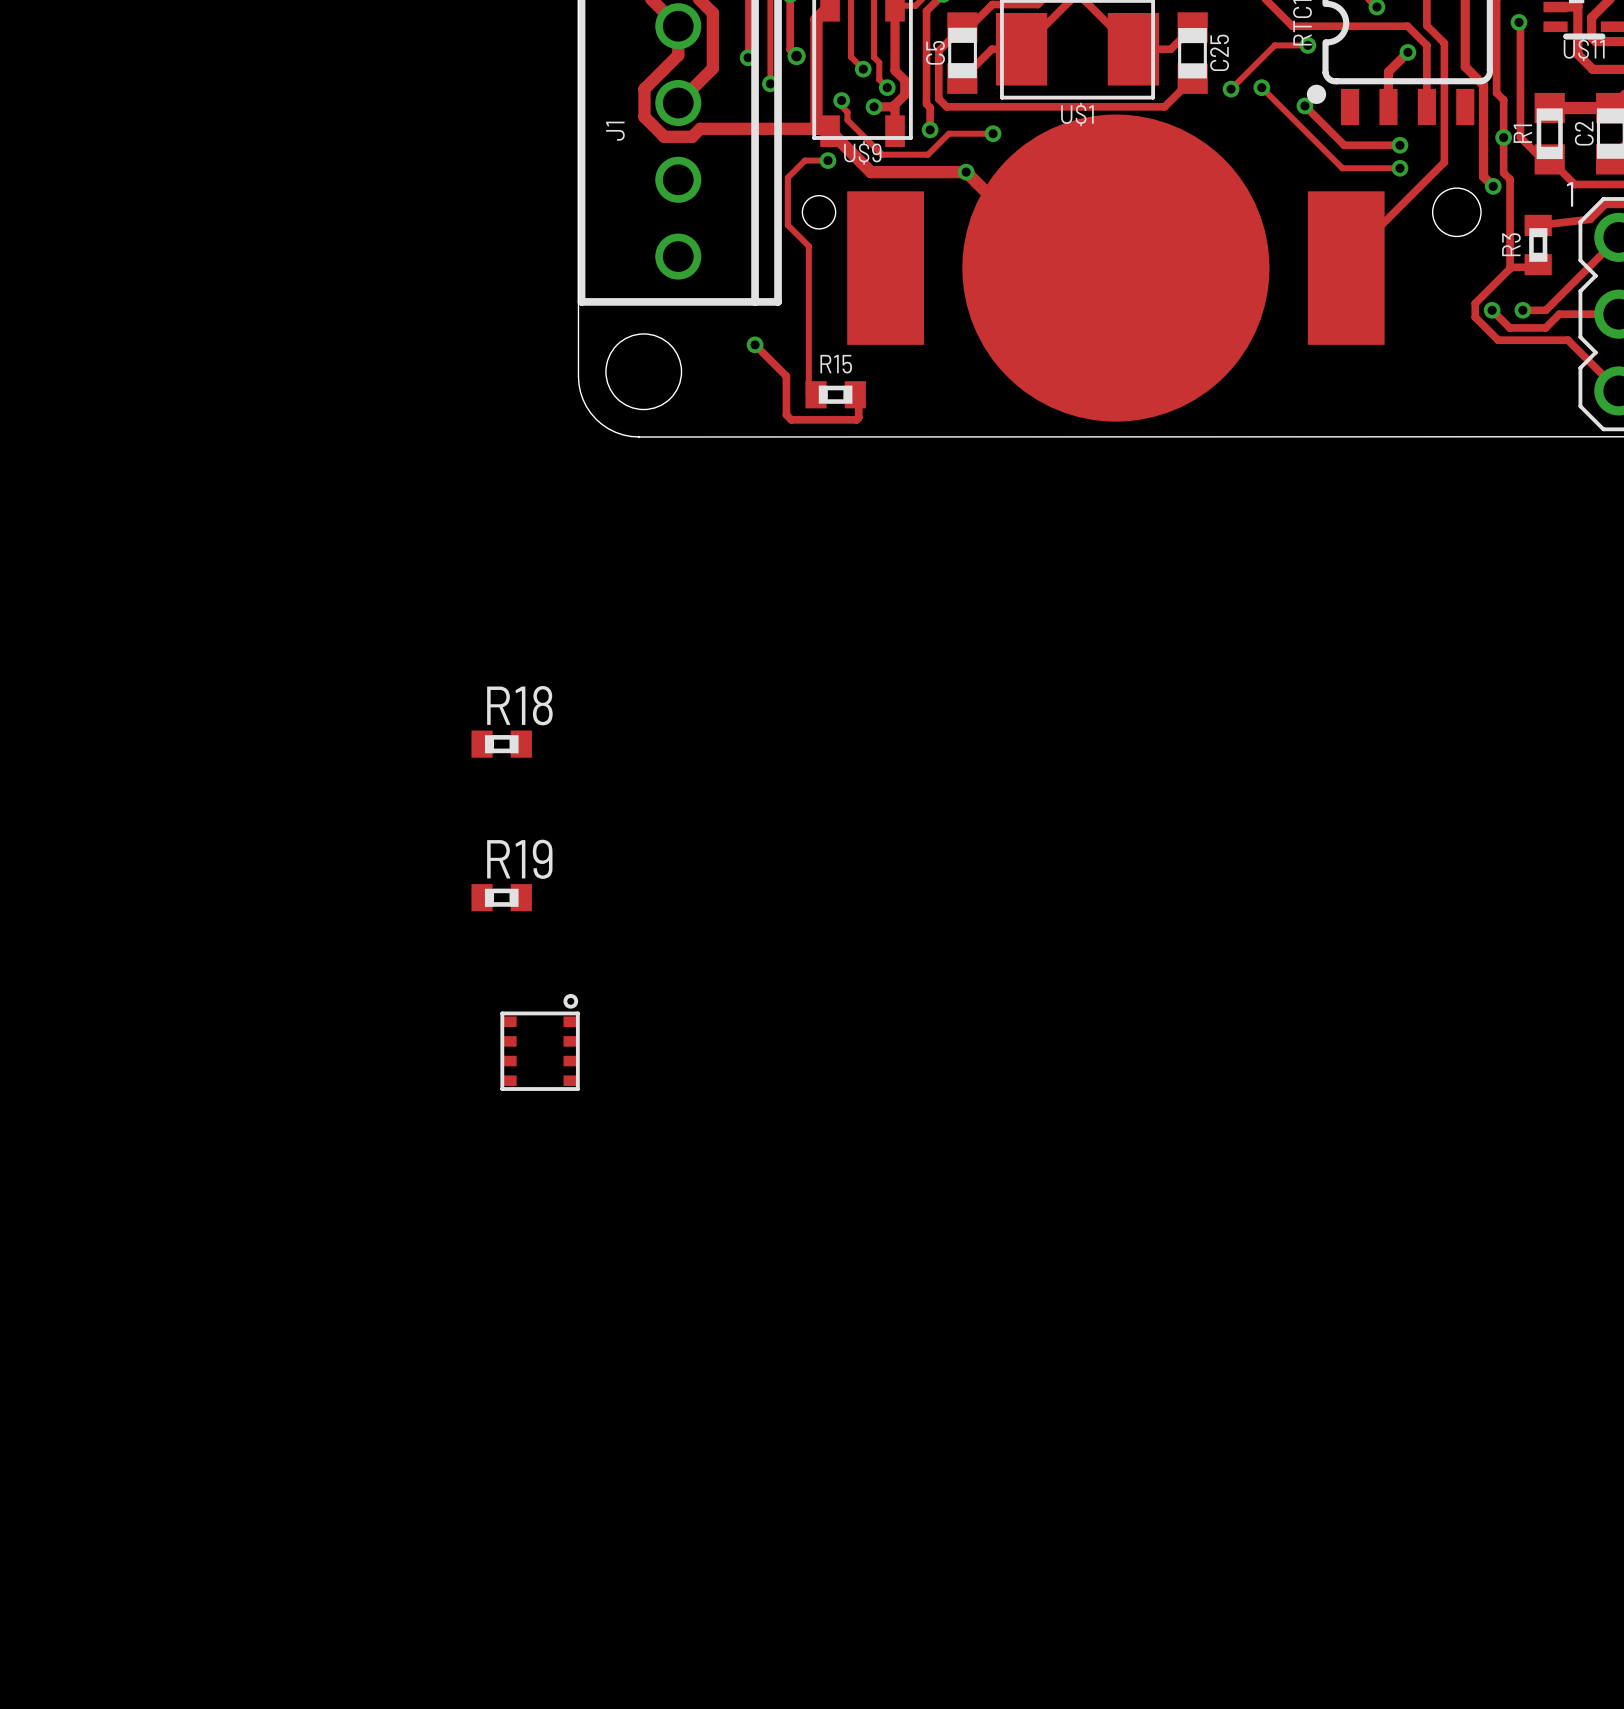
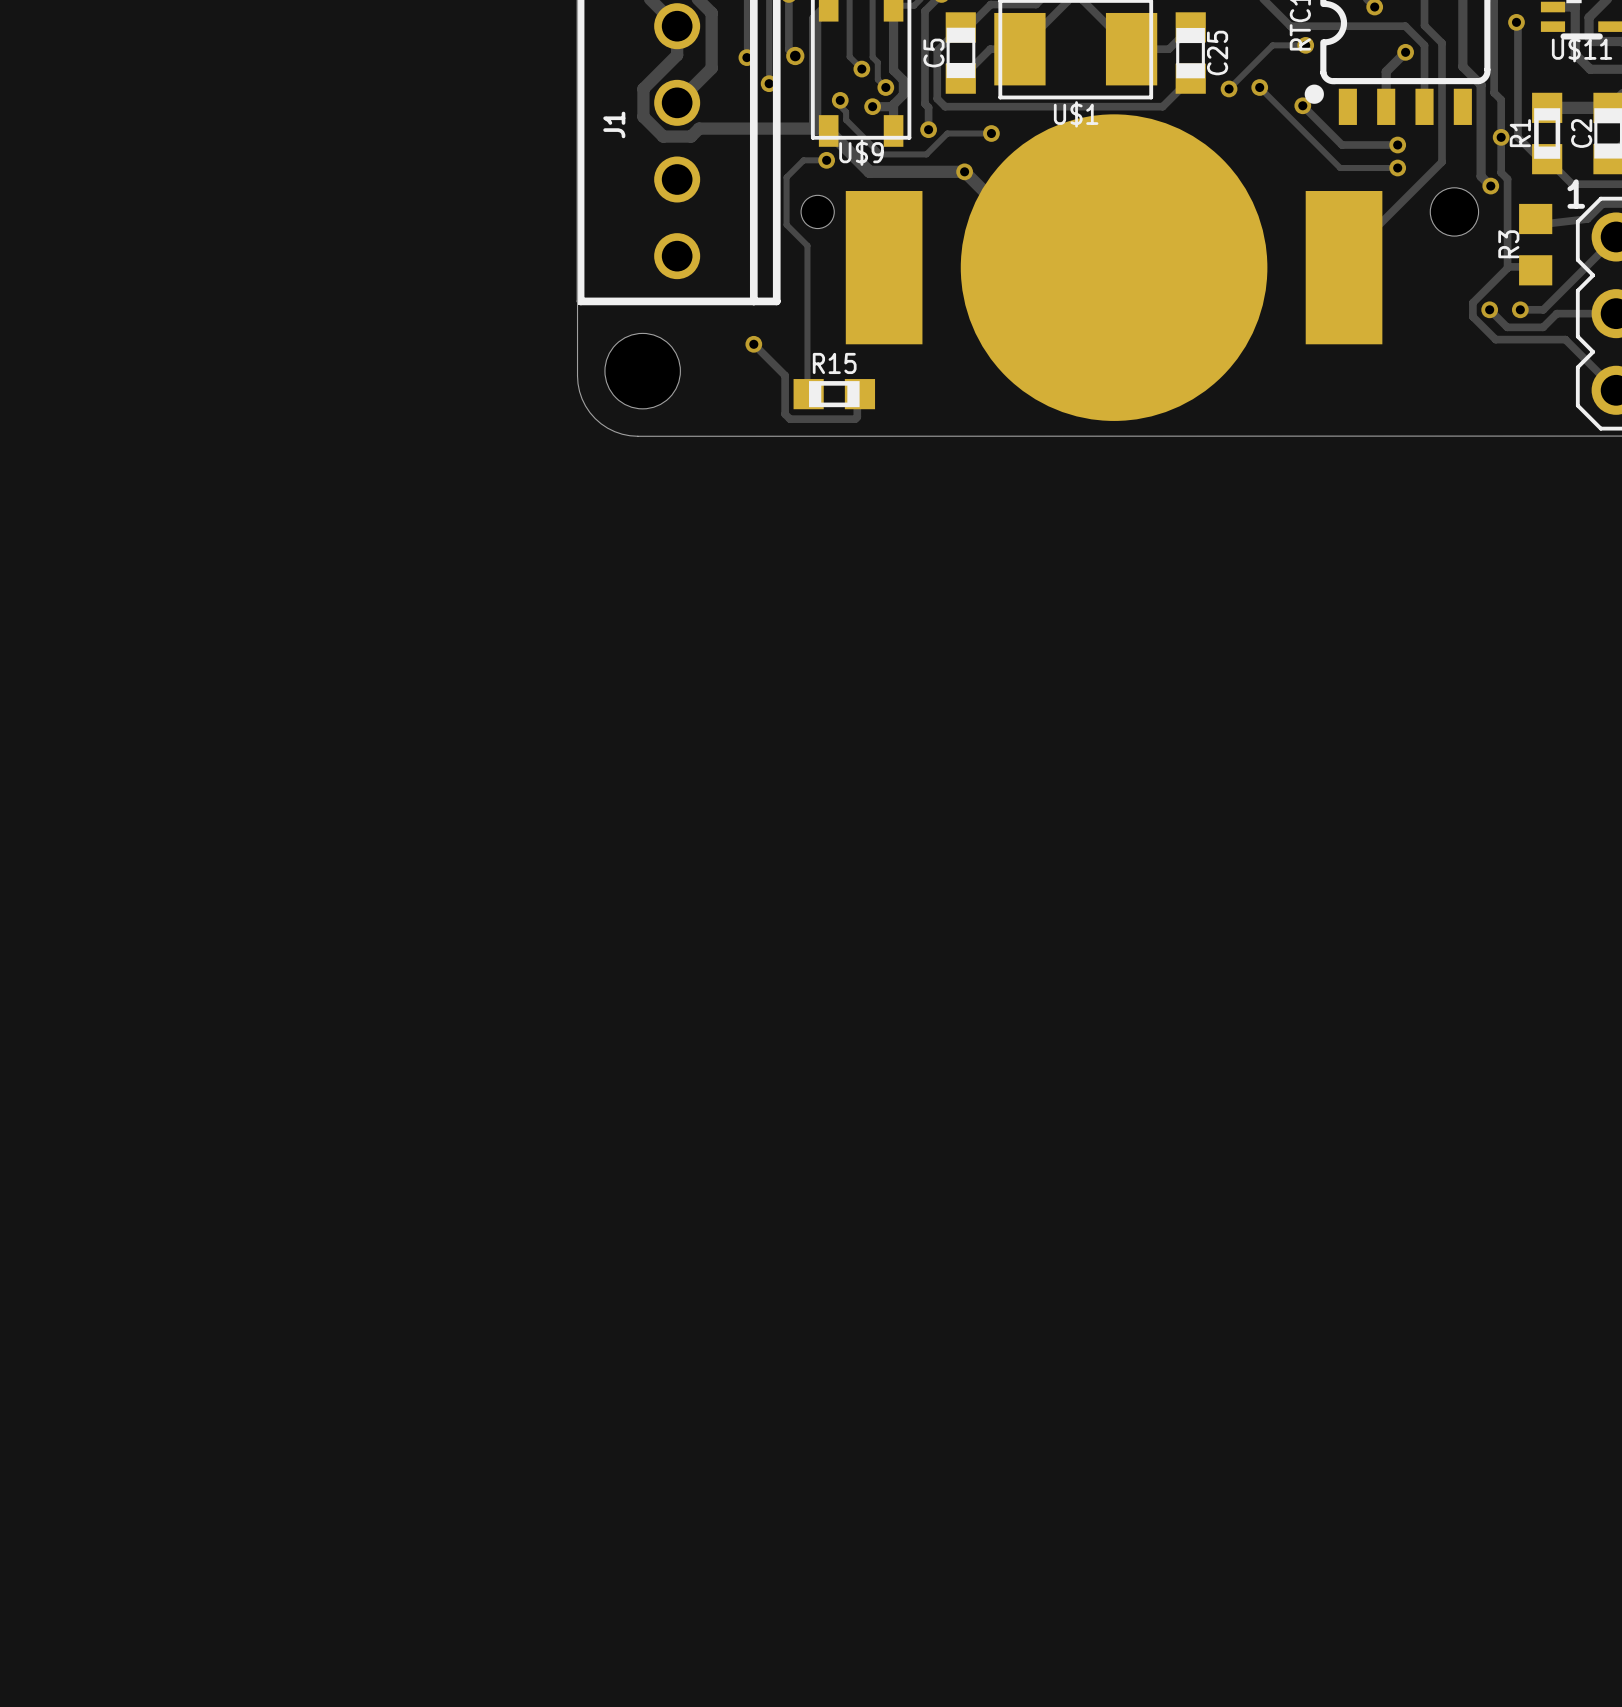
R3 footprint: [1524, 214, 1552, 276] -> [1519, 203, 1553, 286]
R15 footprint: [805, 381, 866, 409] -> [793, 379, 876, 410]
R18: (501, 744) -> none
R19: (501, 897) -> none
part: (540, 1042) -> none

